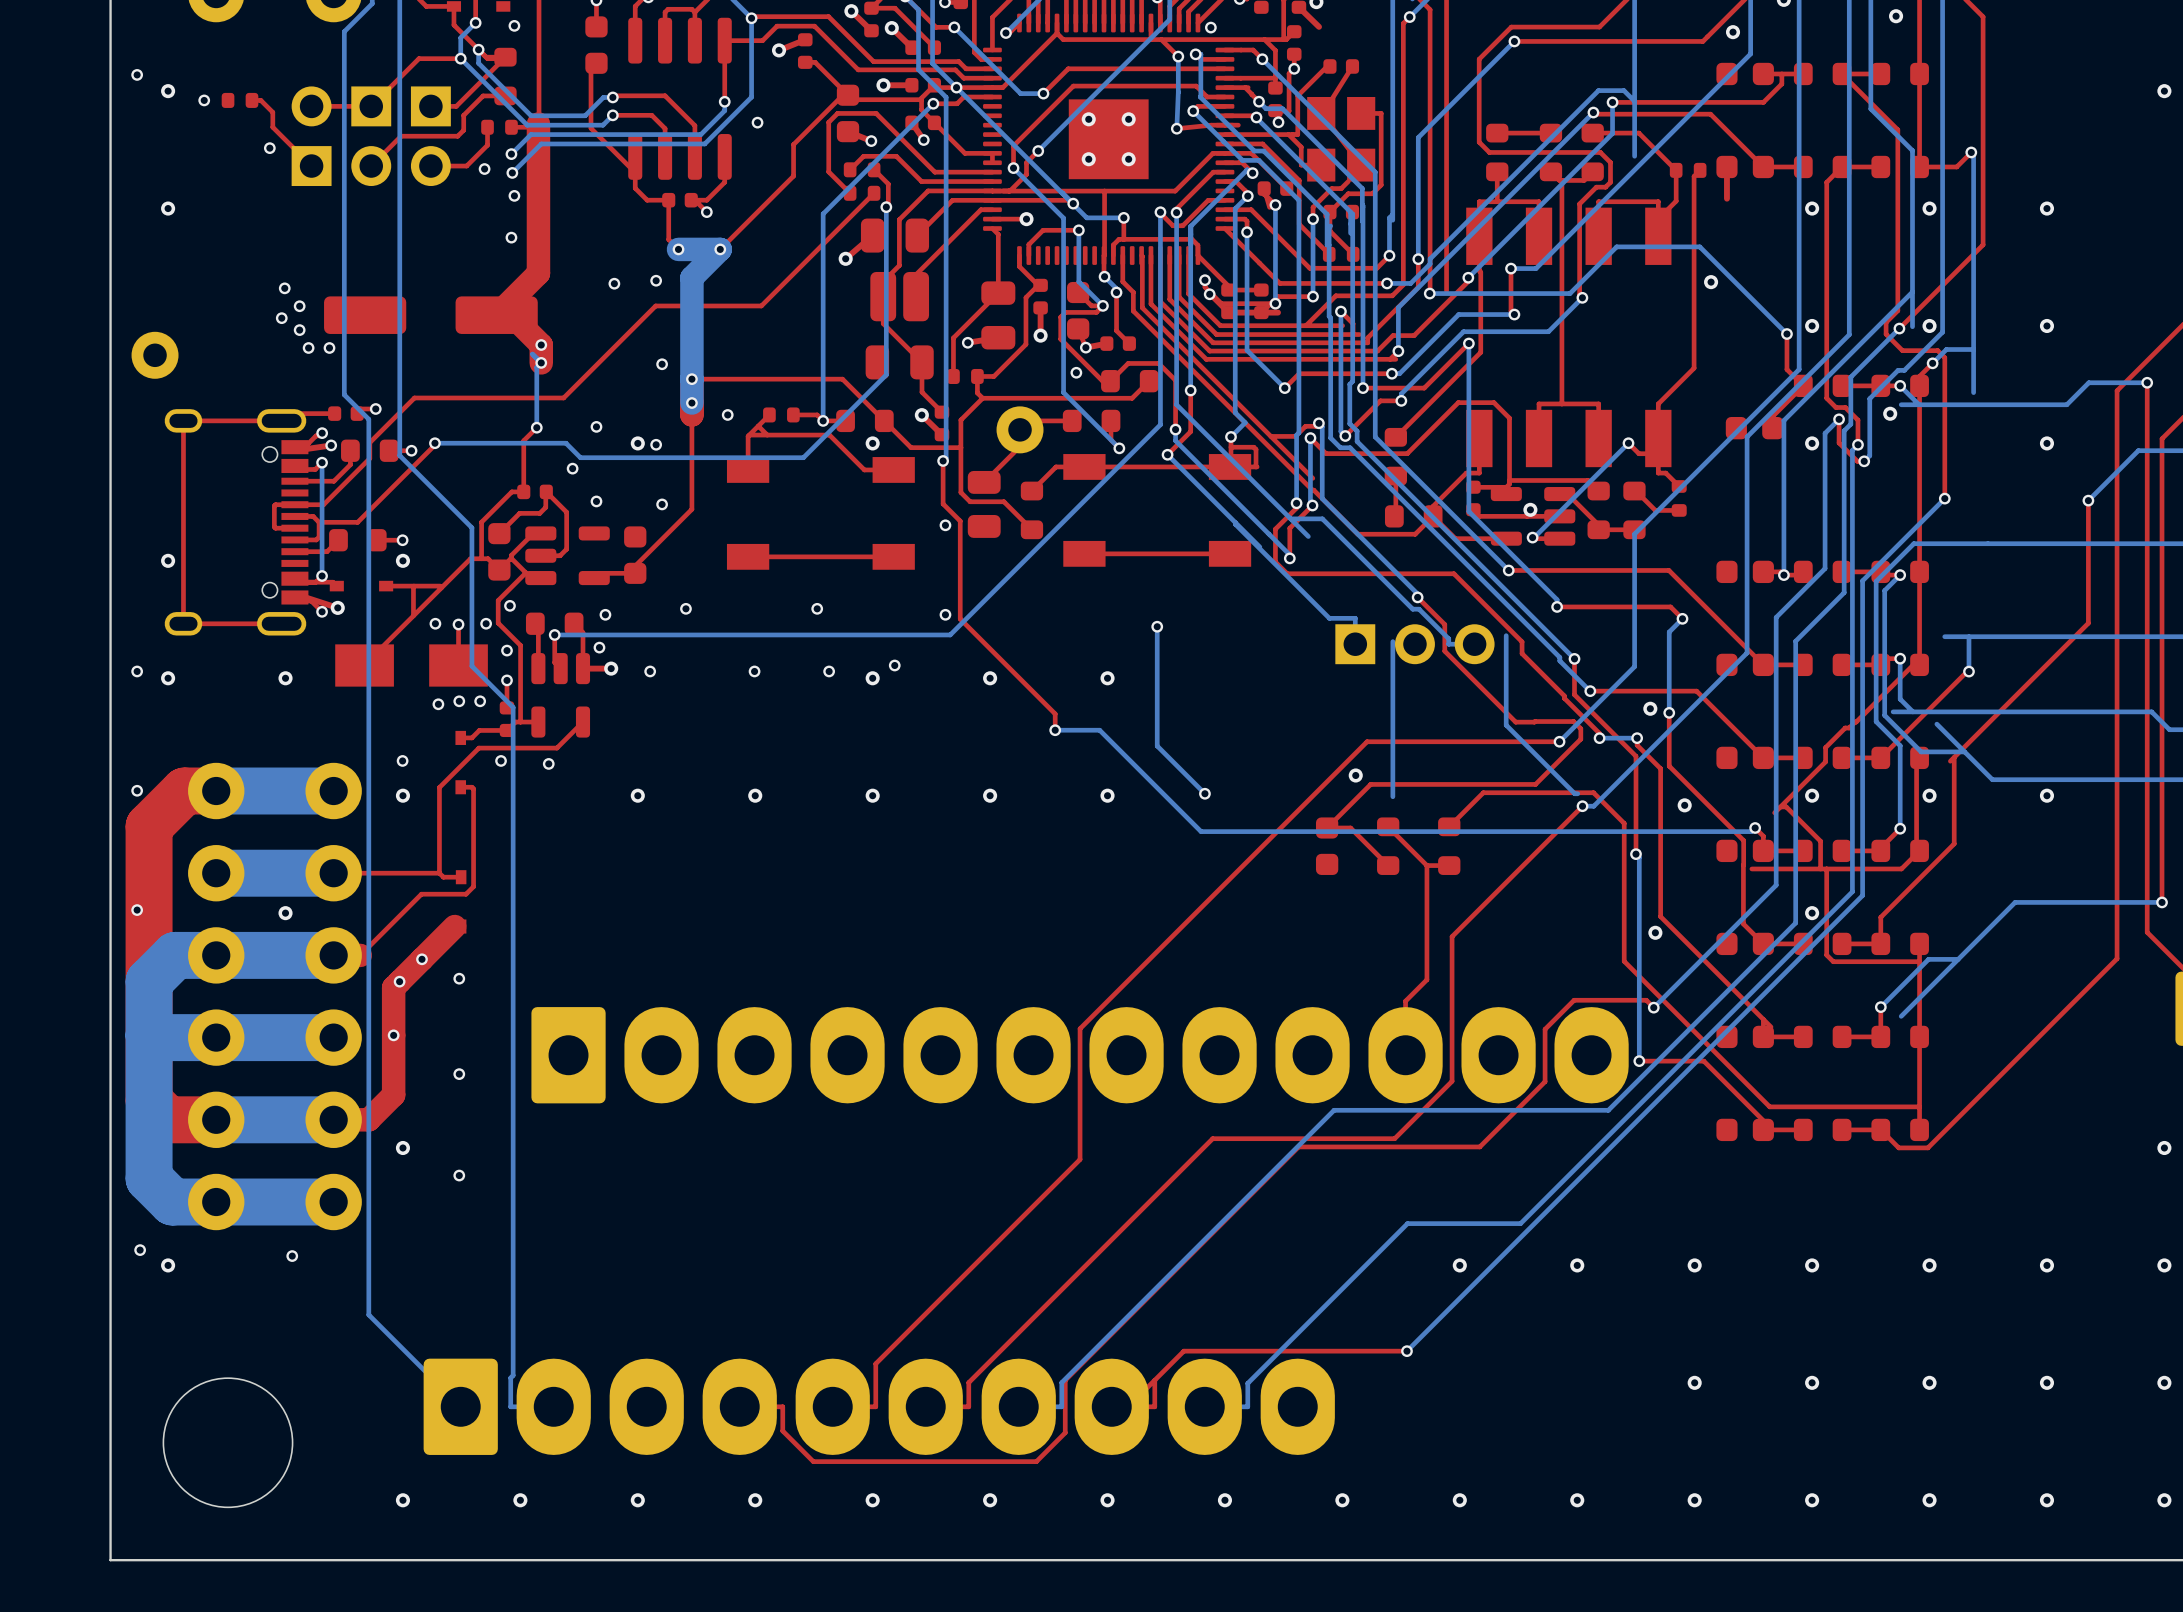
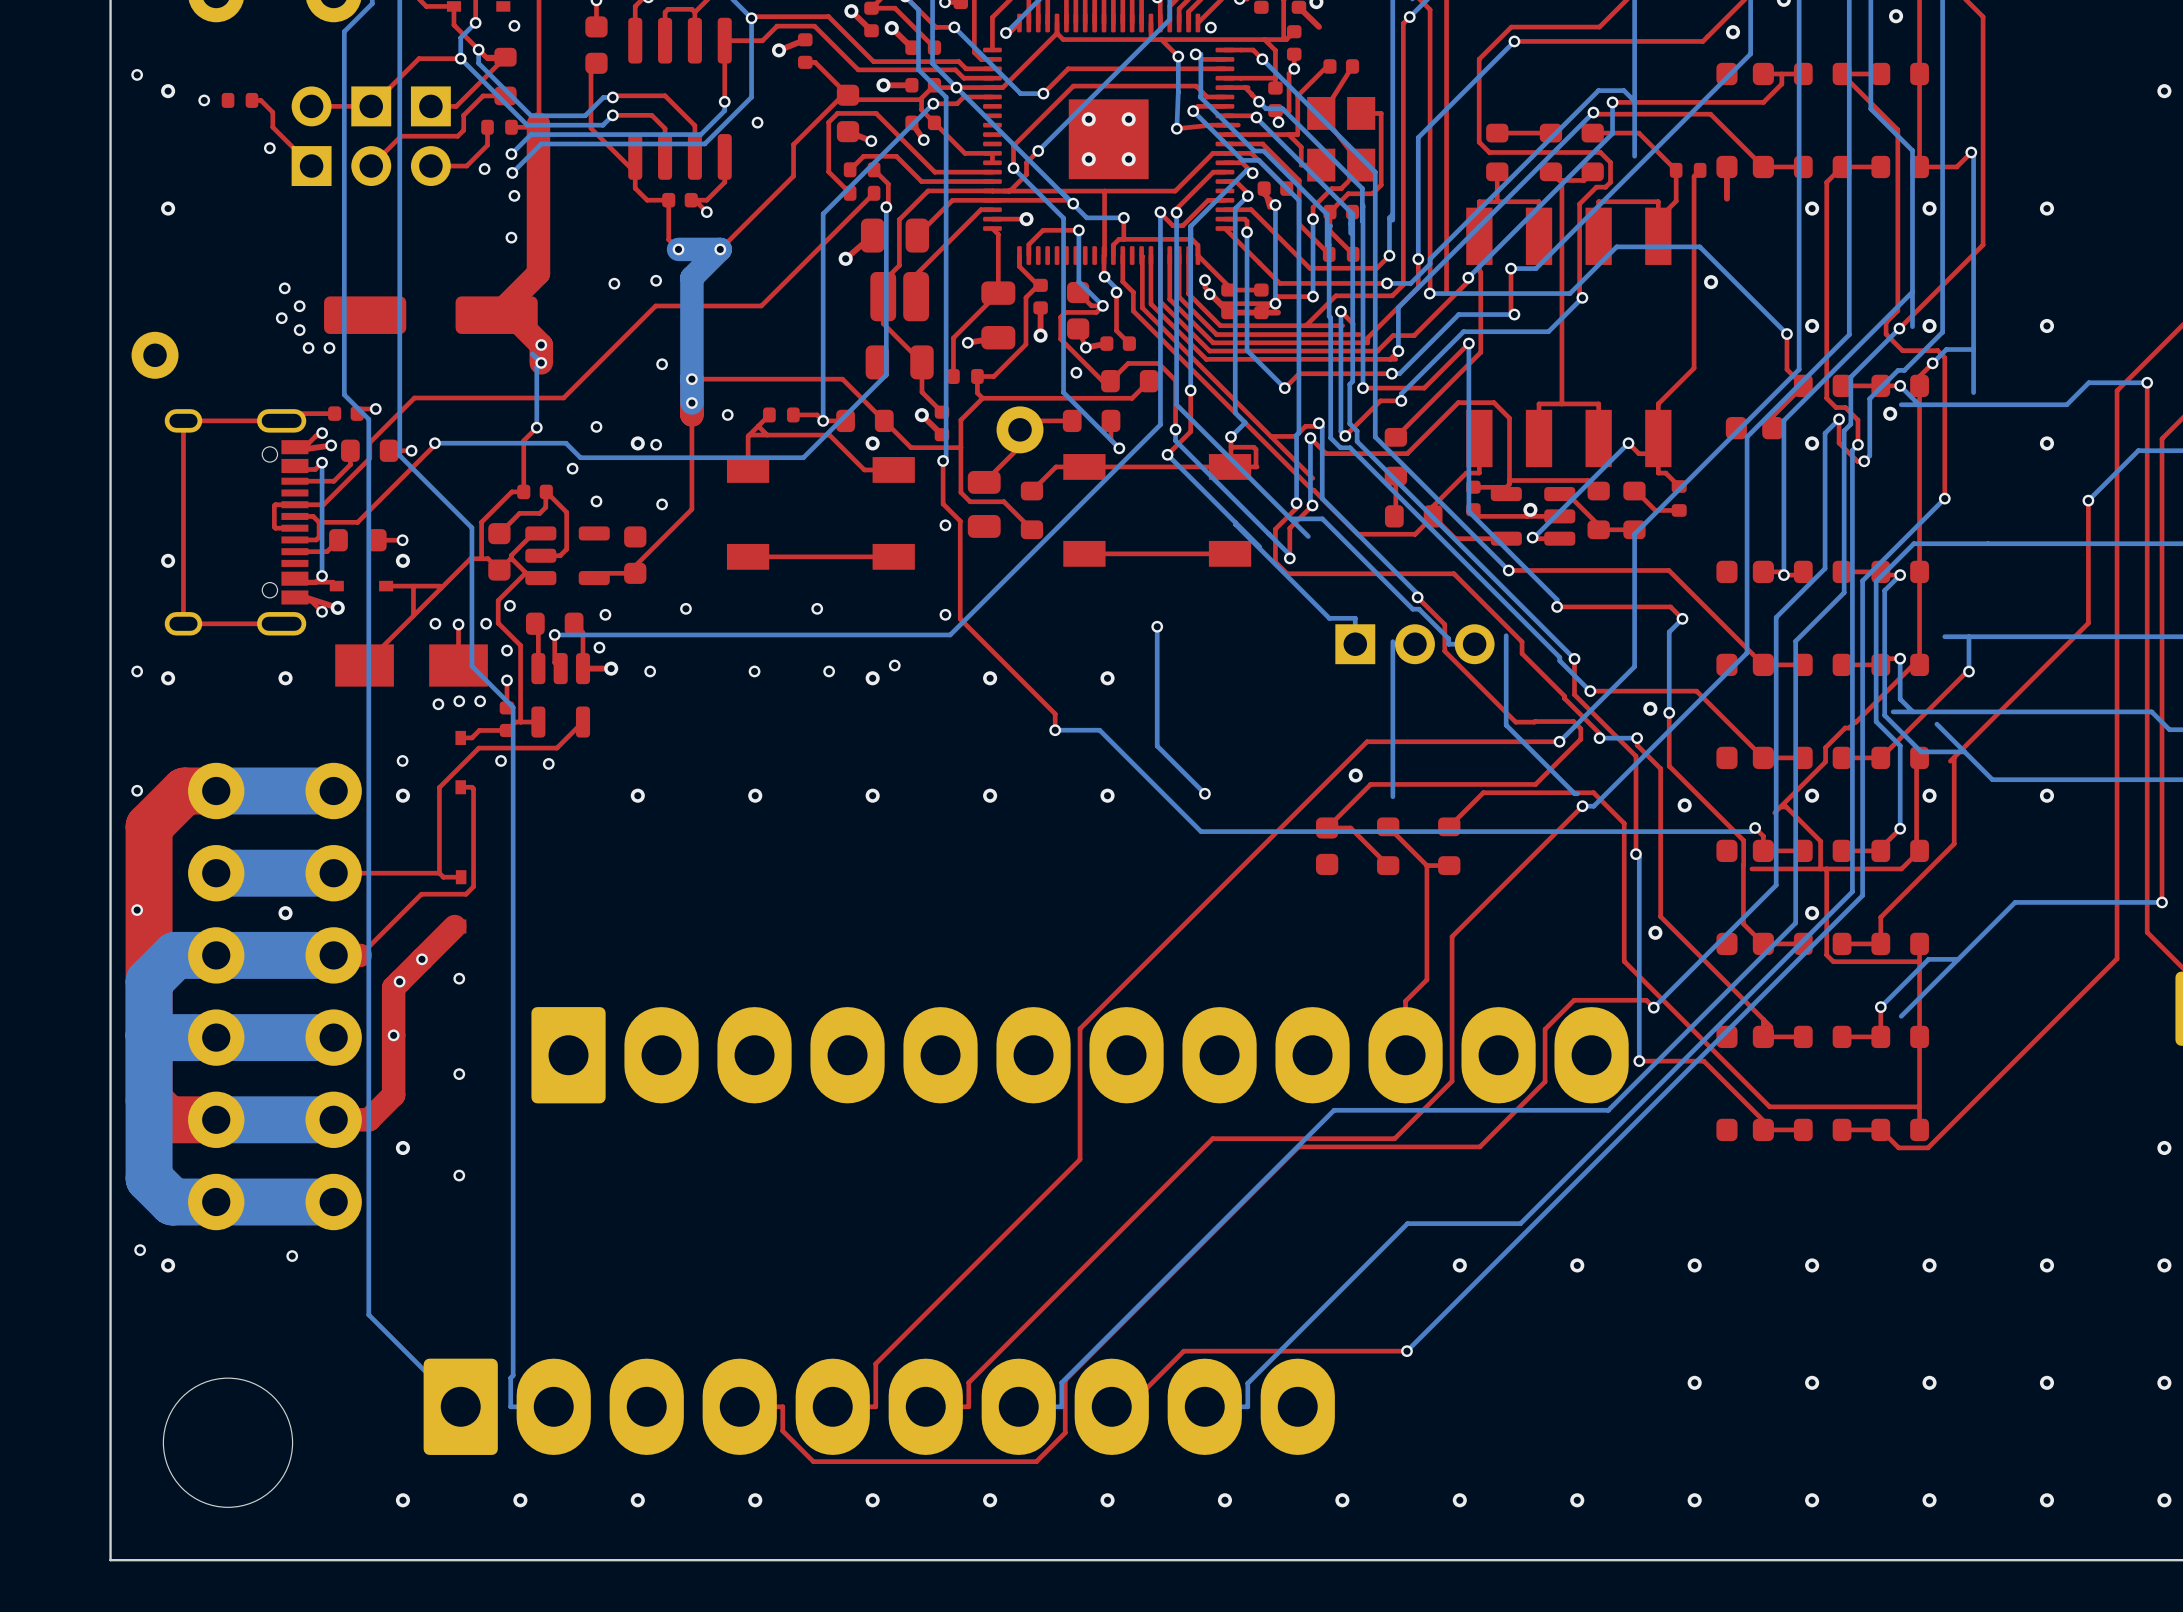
top track: (1154, 1380) (1154, 1406) (1111, 1406) -> none

